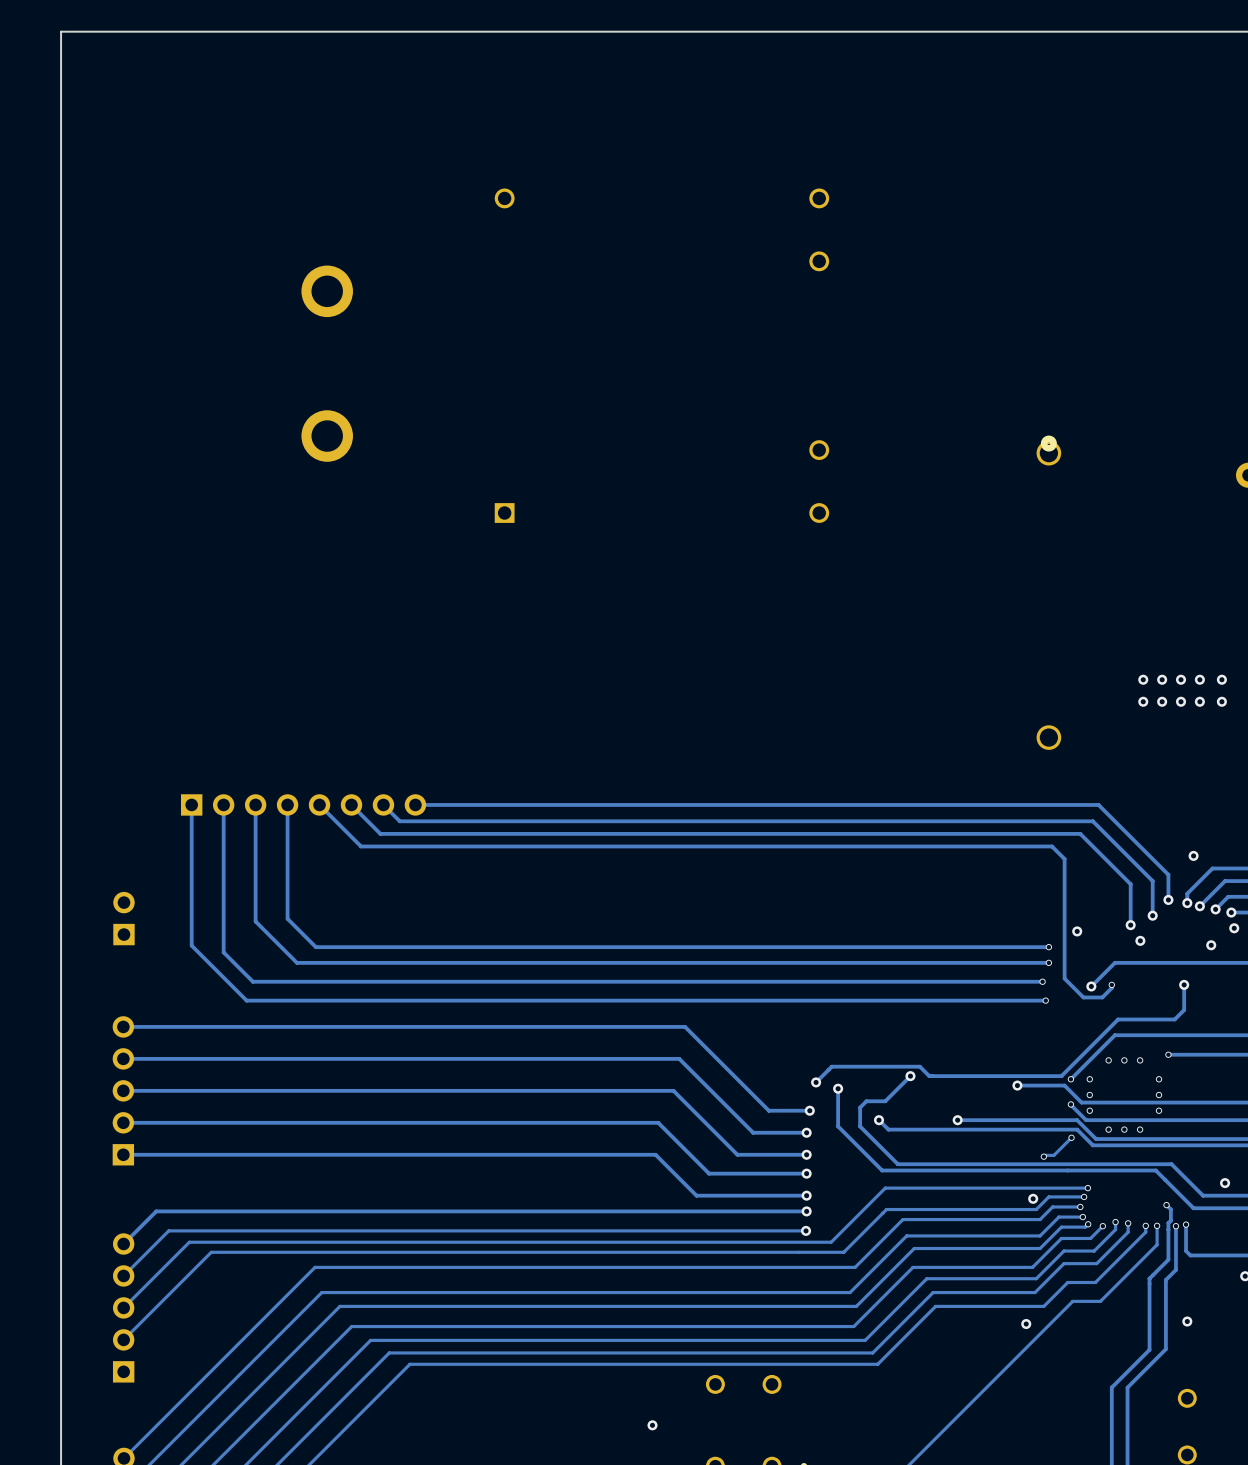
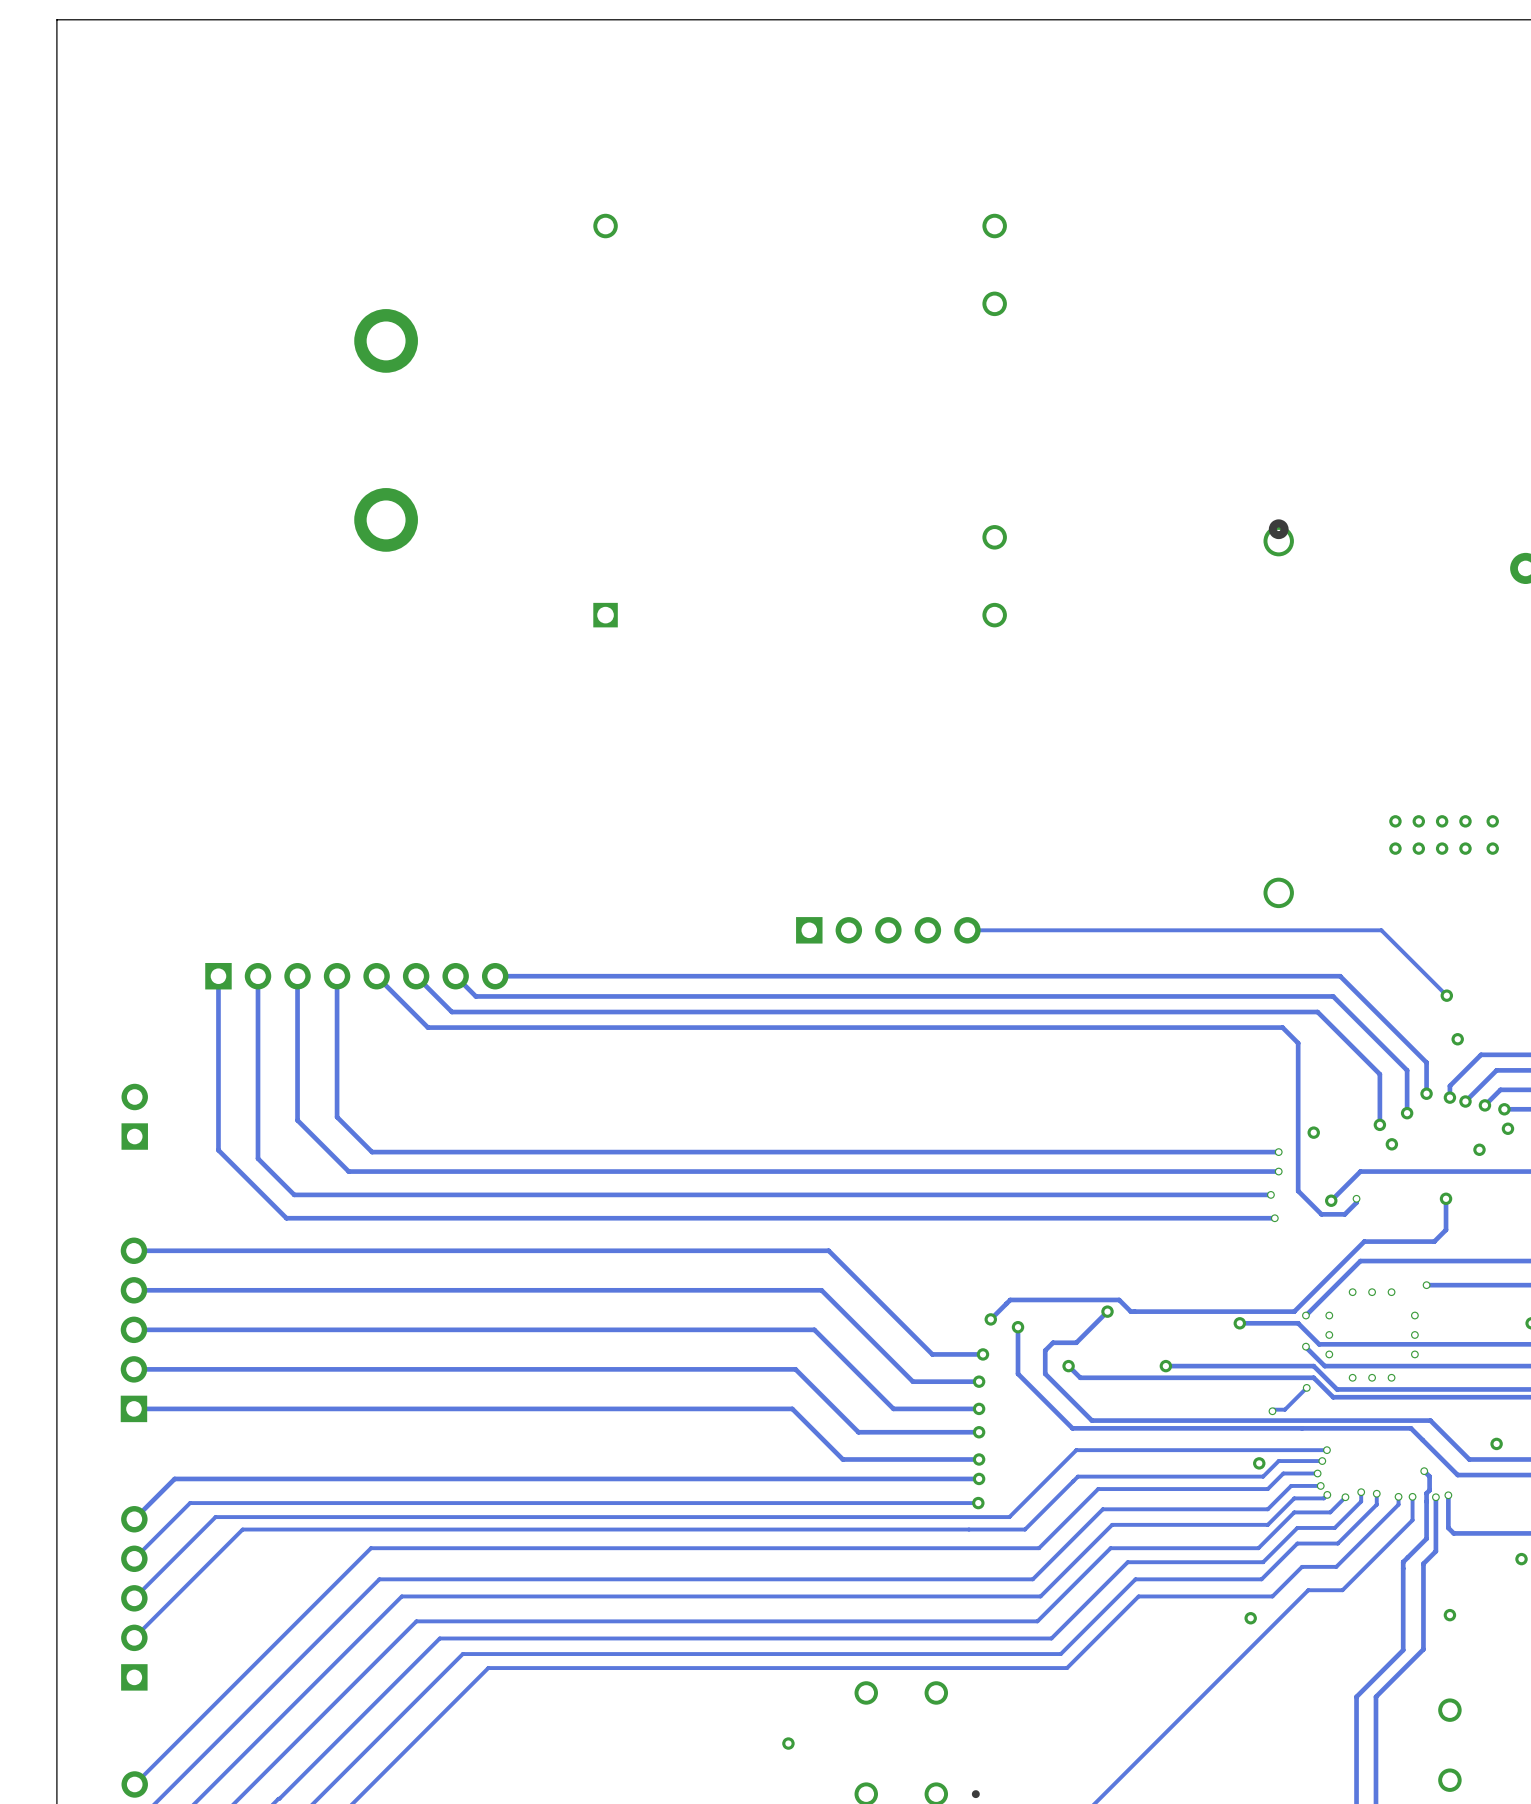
part: none -> (888, 930)
track: none -> (967, 930) (1381, 930) (1446, 995)
via: none -> (1446, 995)

